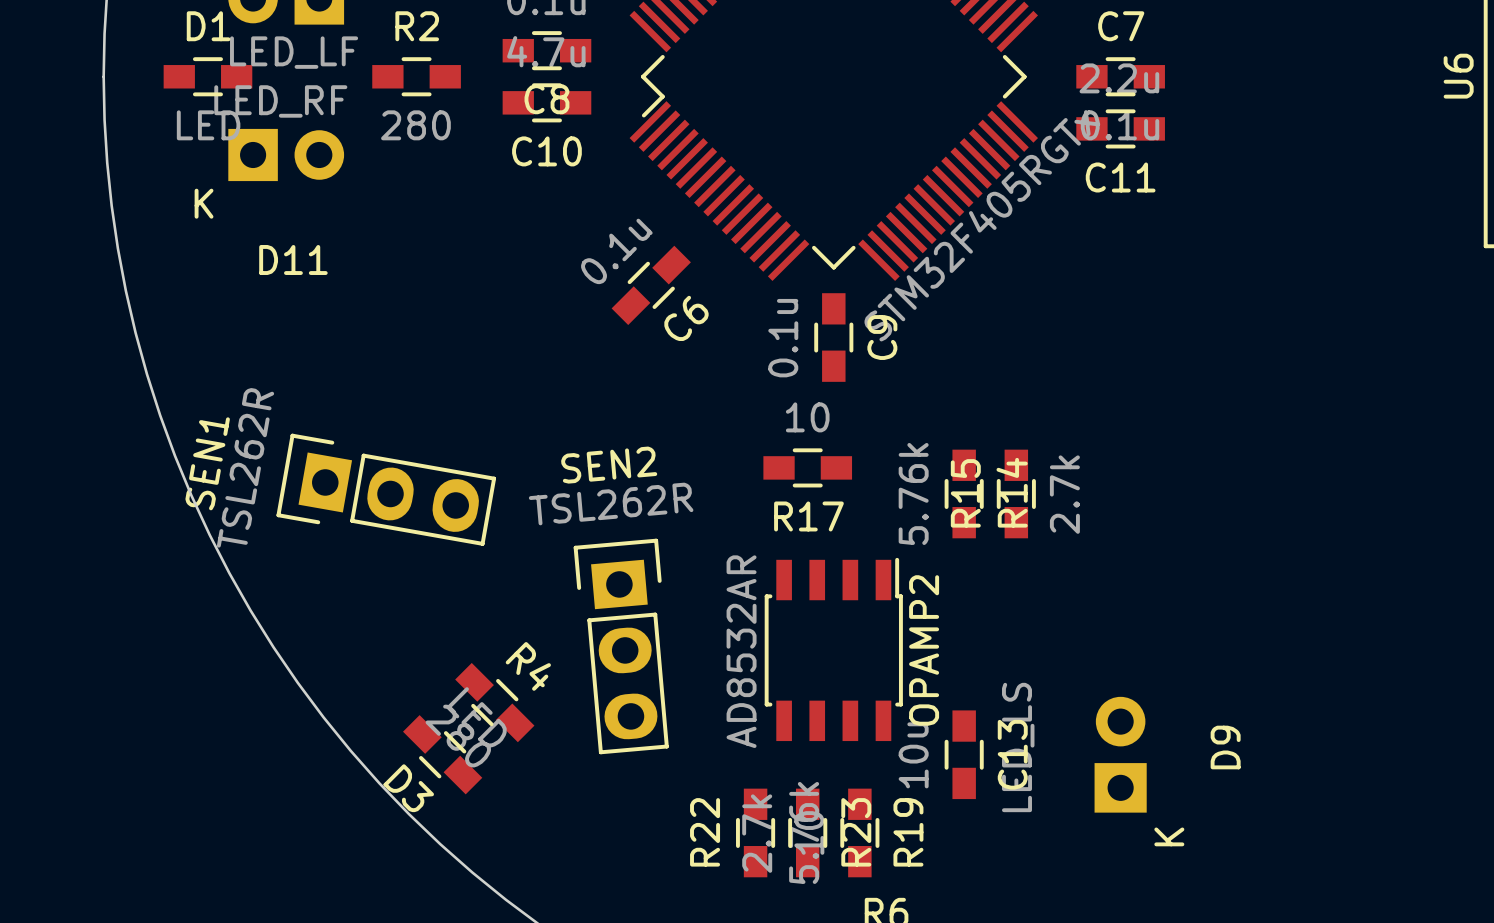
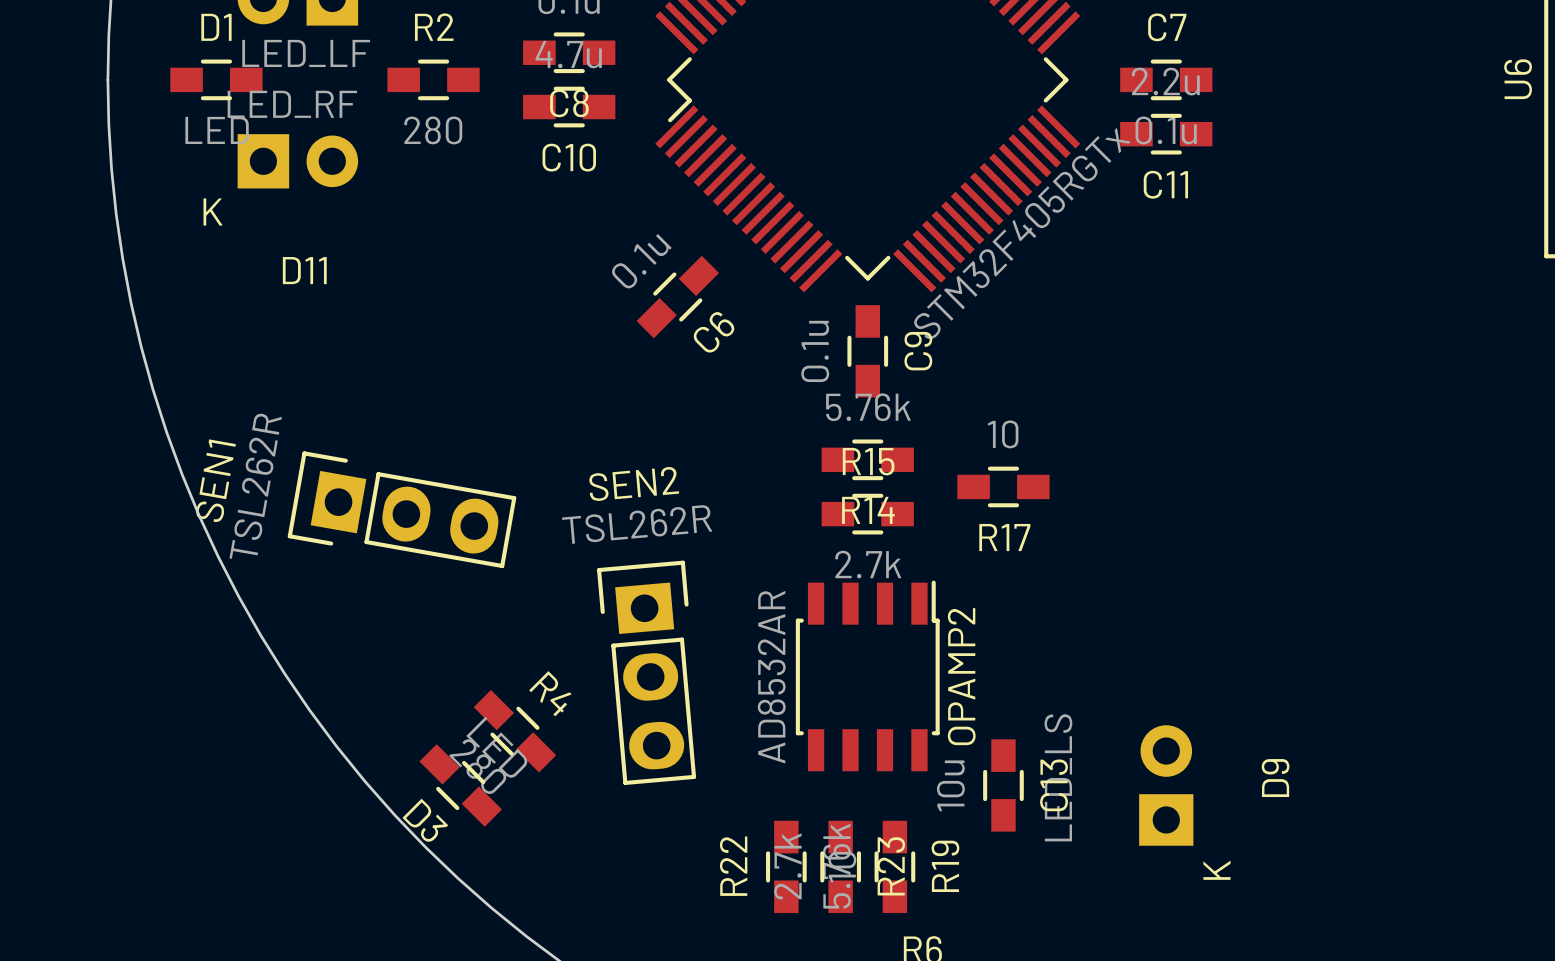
R17 position: (807, 467) -> (1003, 486)
R14 rotation: 0° (964, 493) -> 90° clockwise (867, 459)
R14 position: (964, 493) -> (867, 459)
R15 rotation: 0° (1016, 493) -> 90° clockwise (867, 514)
R15 position: (1016, 493) -> (867, 514)

